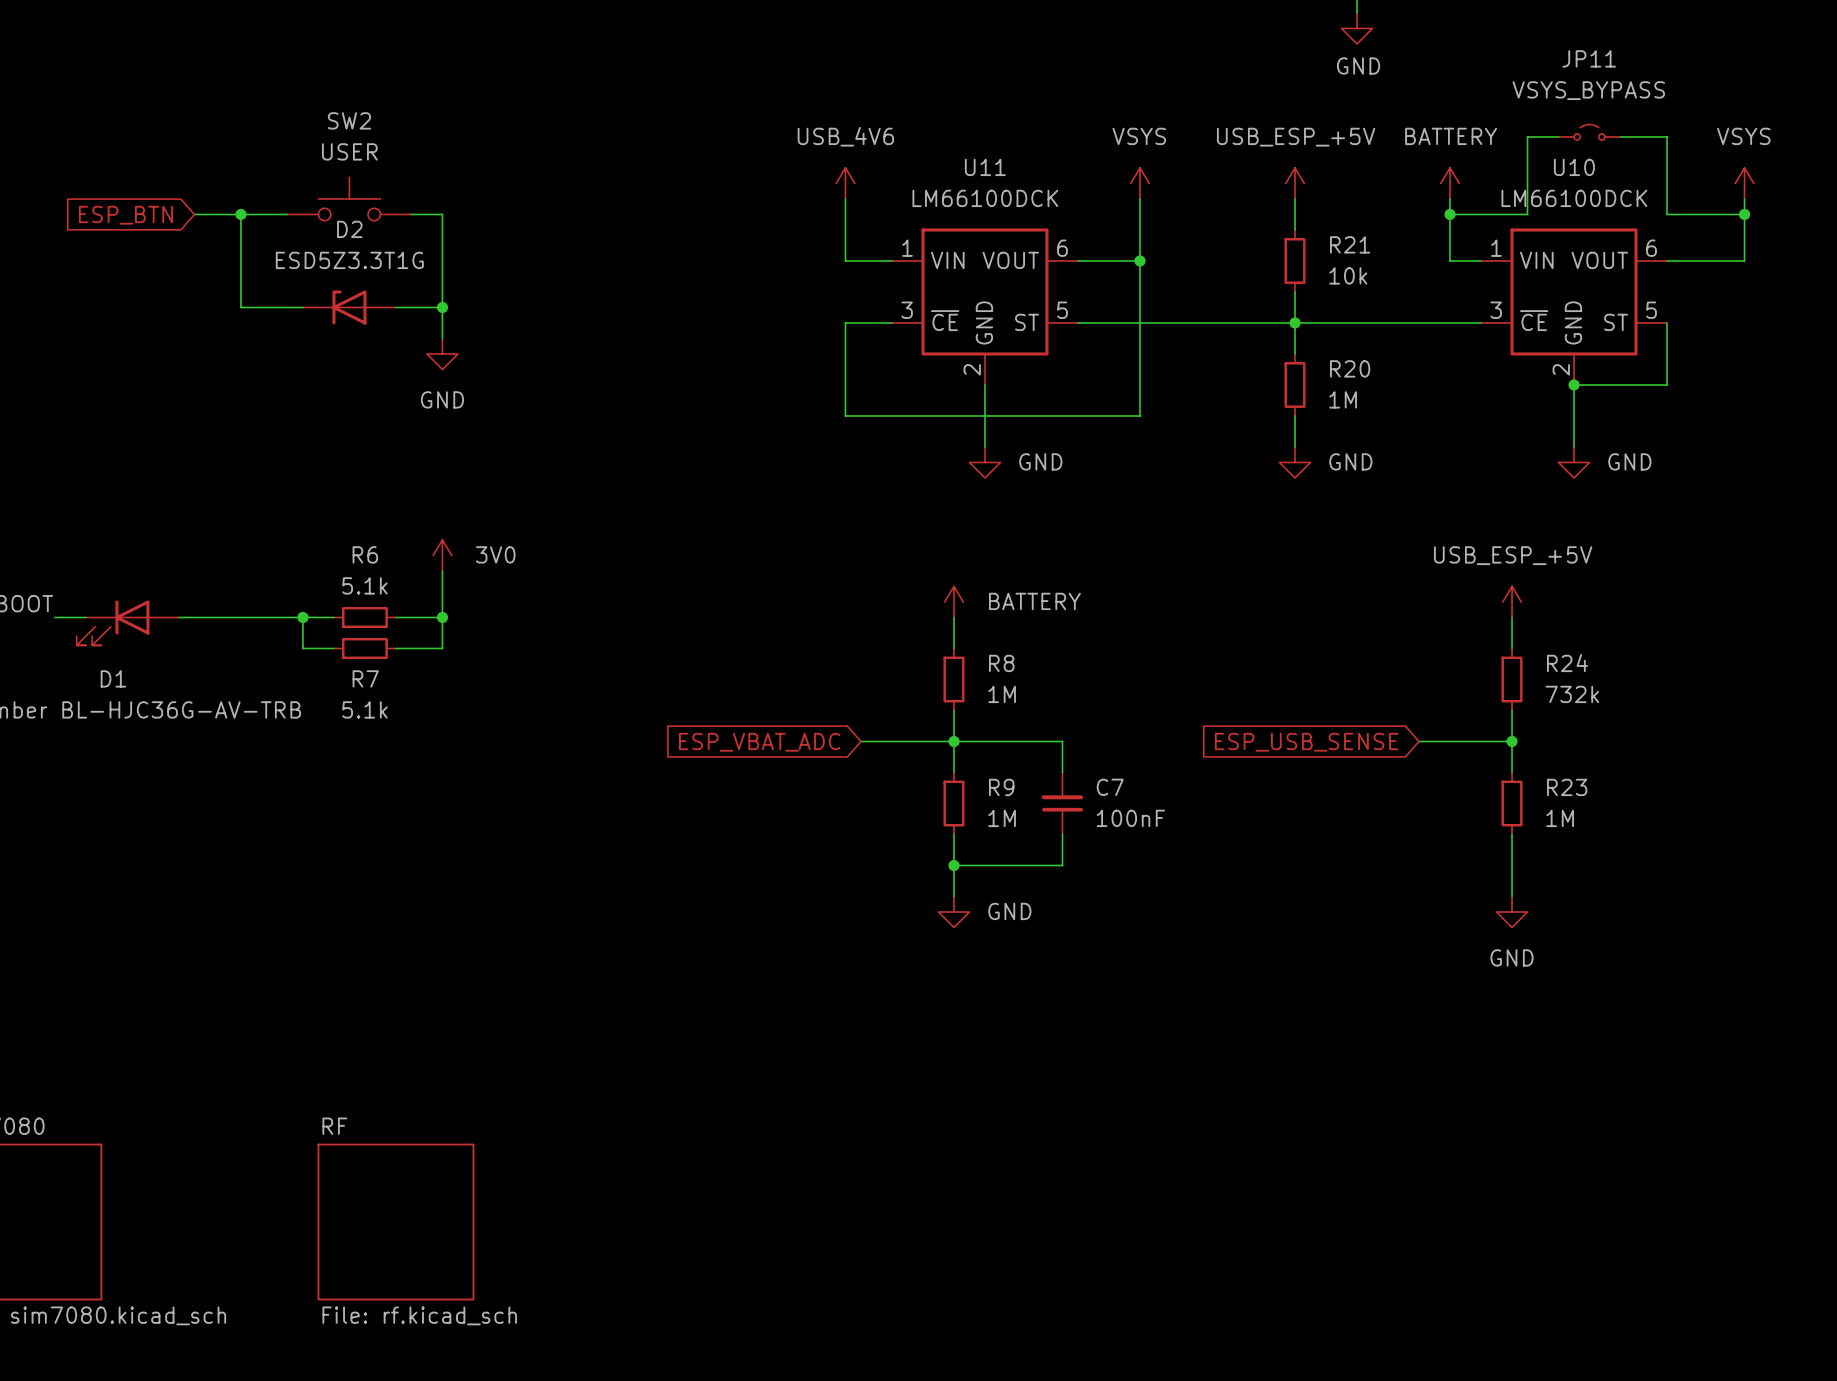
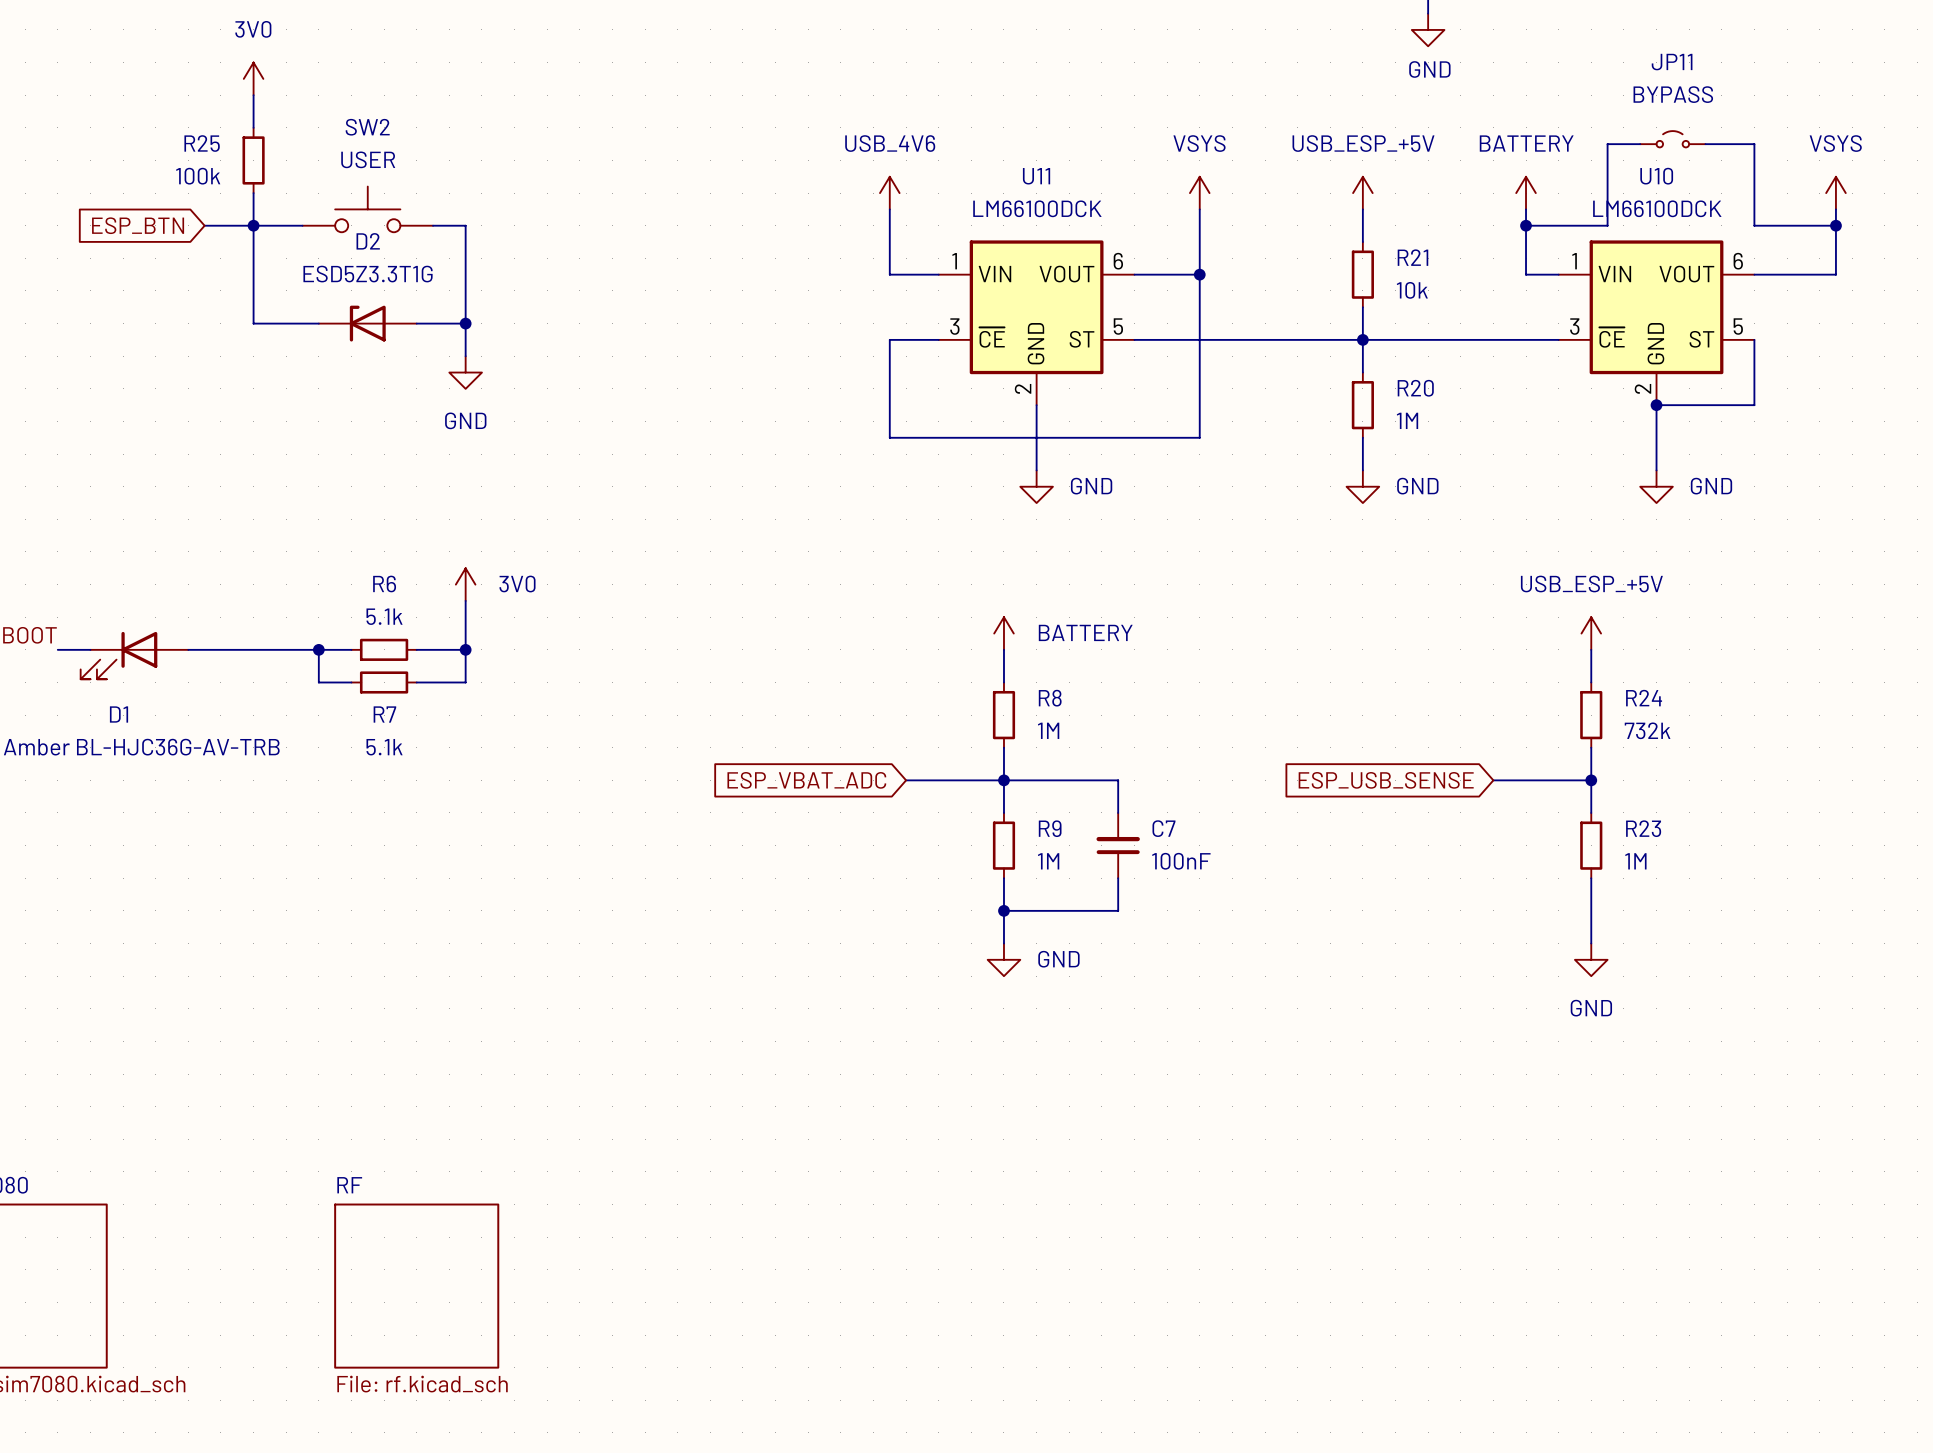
power symbol: none -> 3V0 (253, 78)
wire: none -> (253, 95) (253, 127)
JP11 value: VSYS_BYPASS (1588, 90) -> BYPASS (1673, 94)
R25: none -> 100k (253, 160)
wire: none -> (253, 193) (253, 225)

